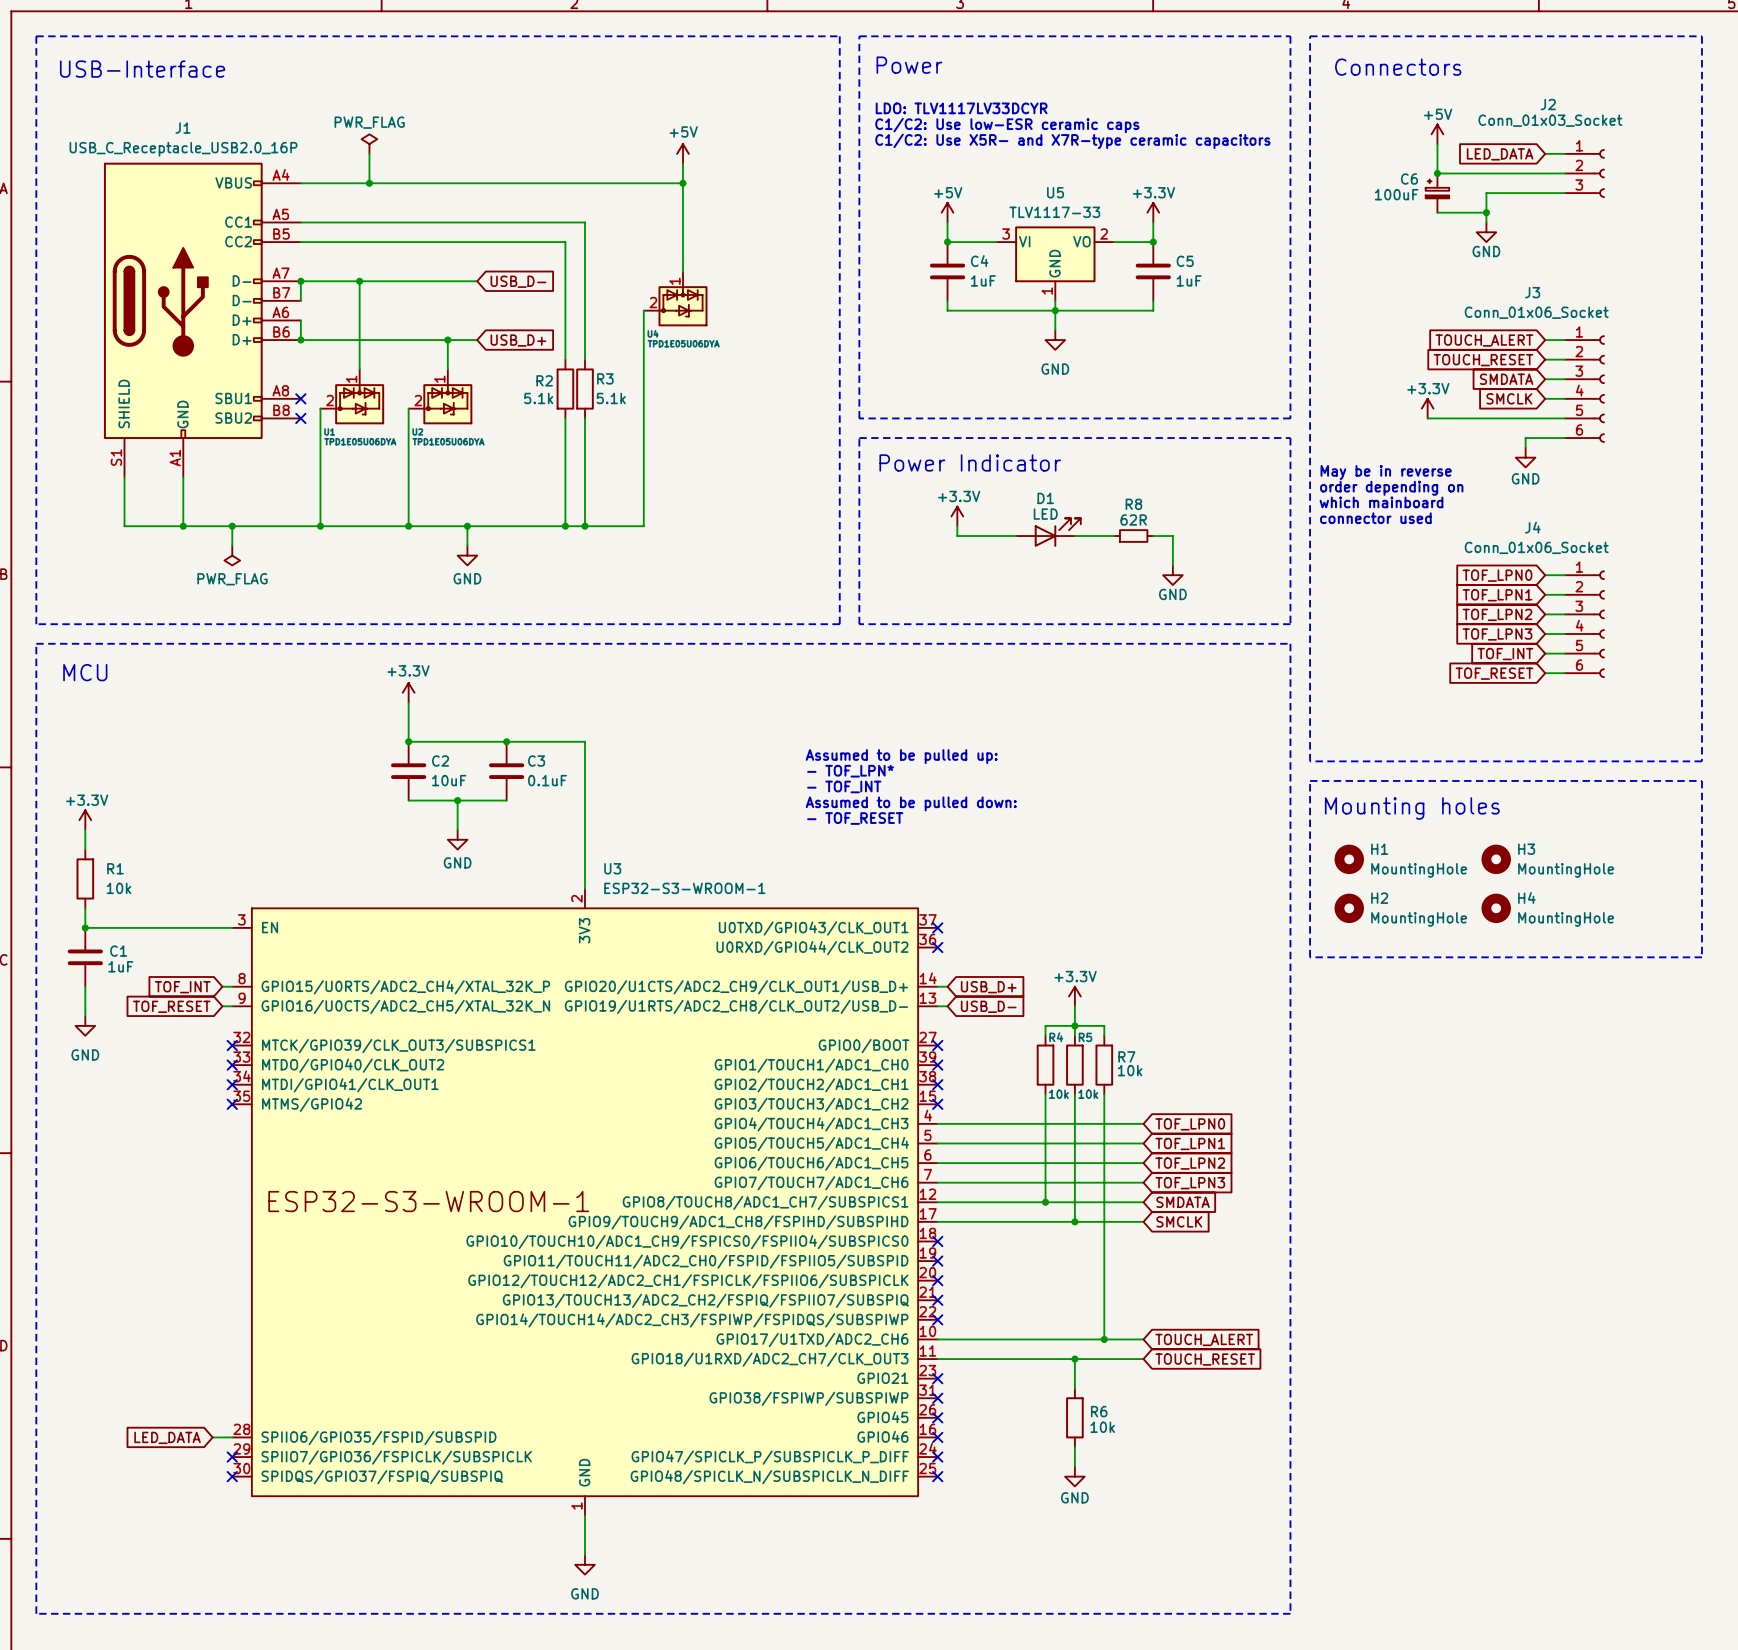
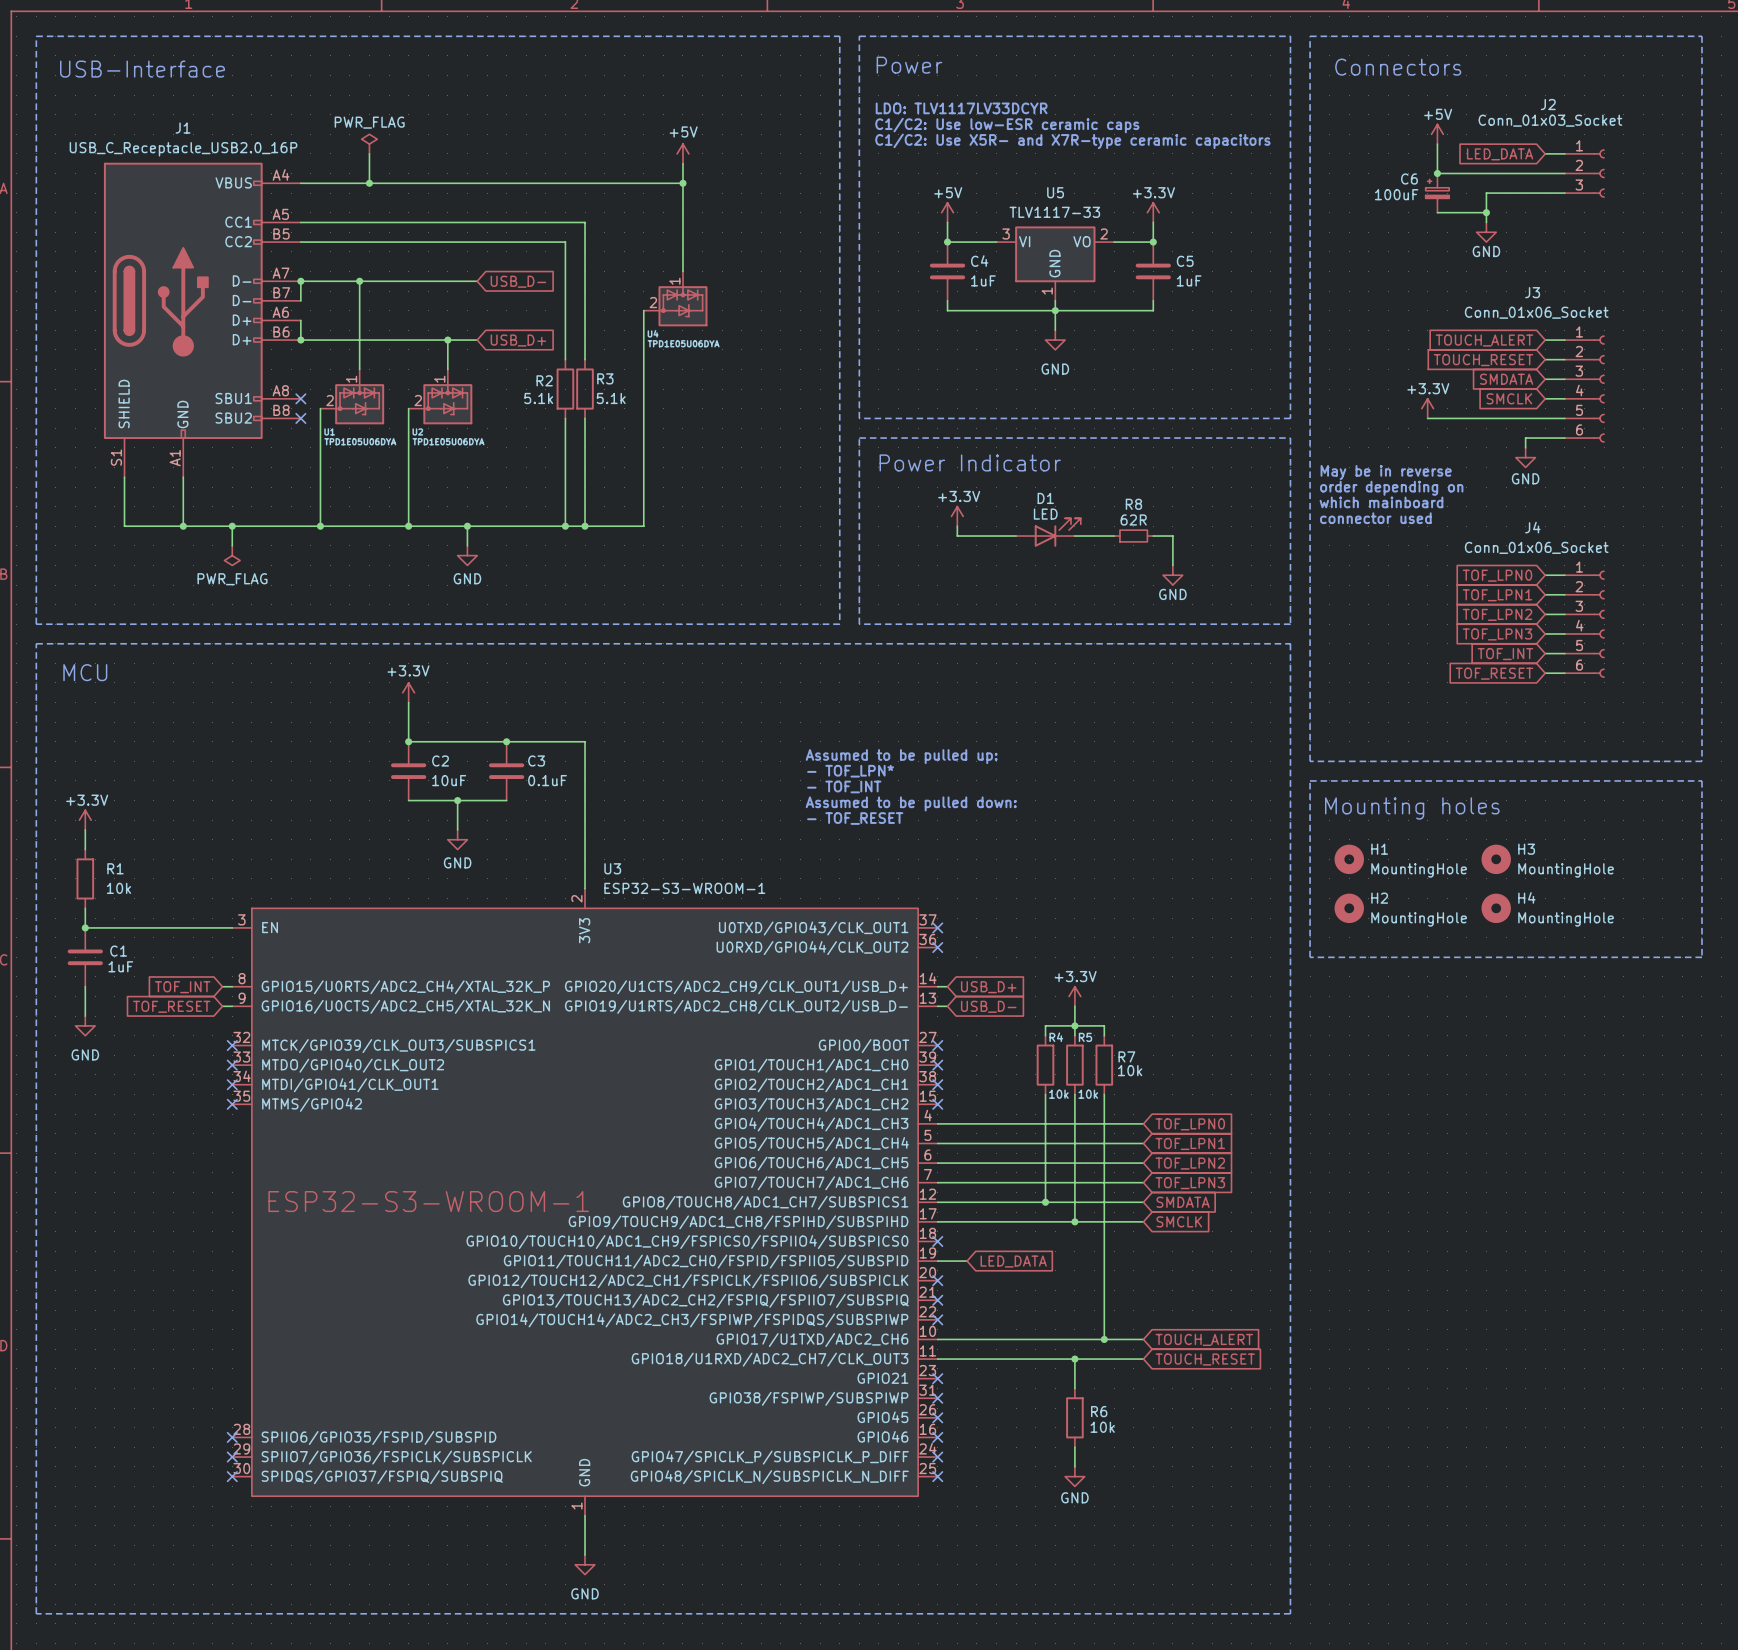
wire: none -> (937, 1261) (967, 1261)
no-connect mark: (937, 1261) -> none
global label: none -> LED_DATA (1013, 1261)
global label: LED_DATA (167, 1437) -> none
wire: (212, 1437) (232, 1437) -> none
no-connect mark: none -> (232, 1437)

